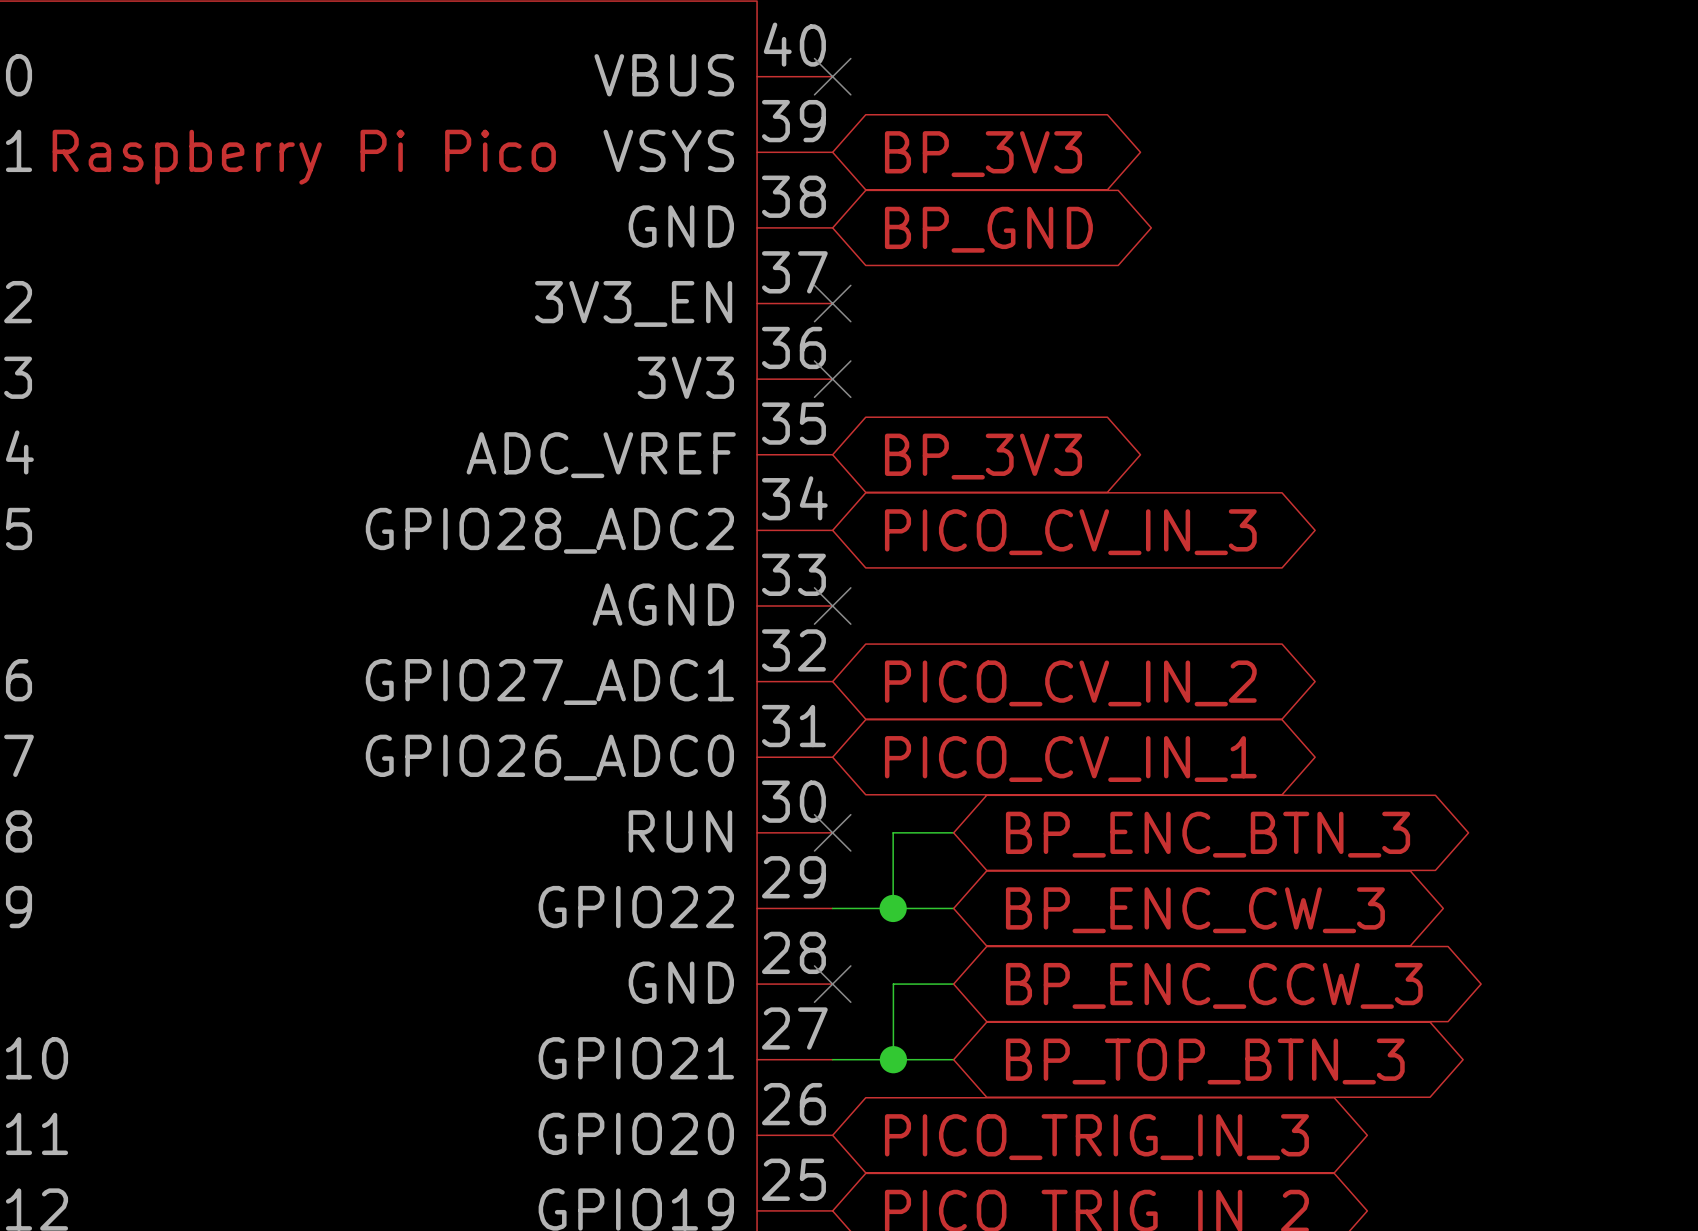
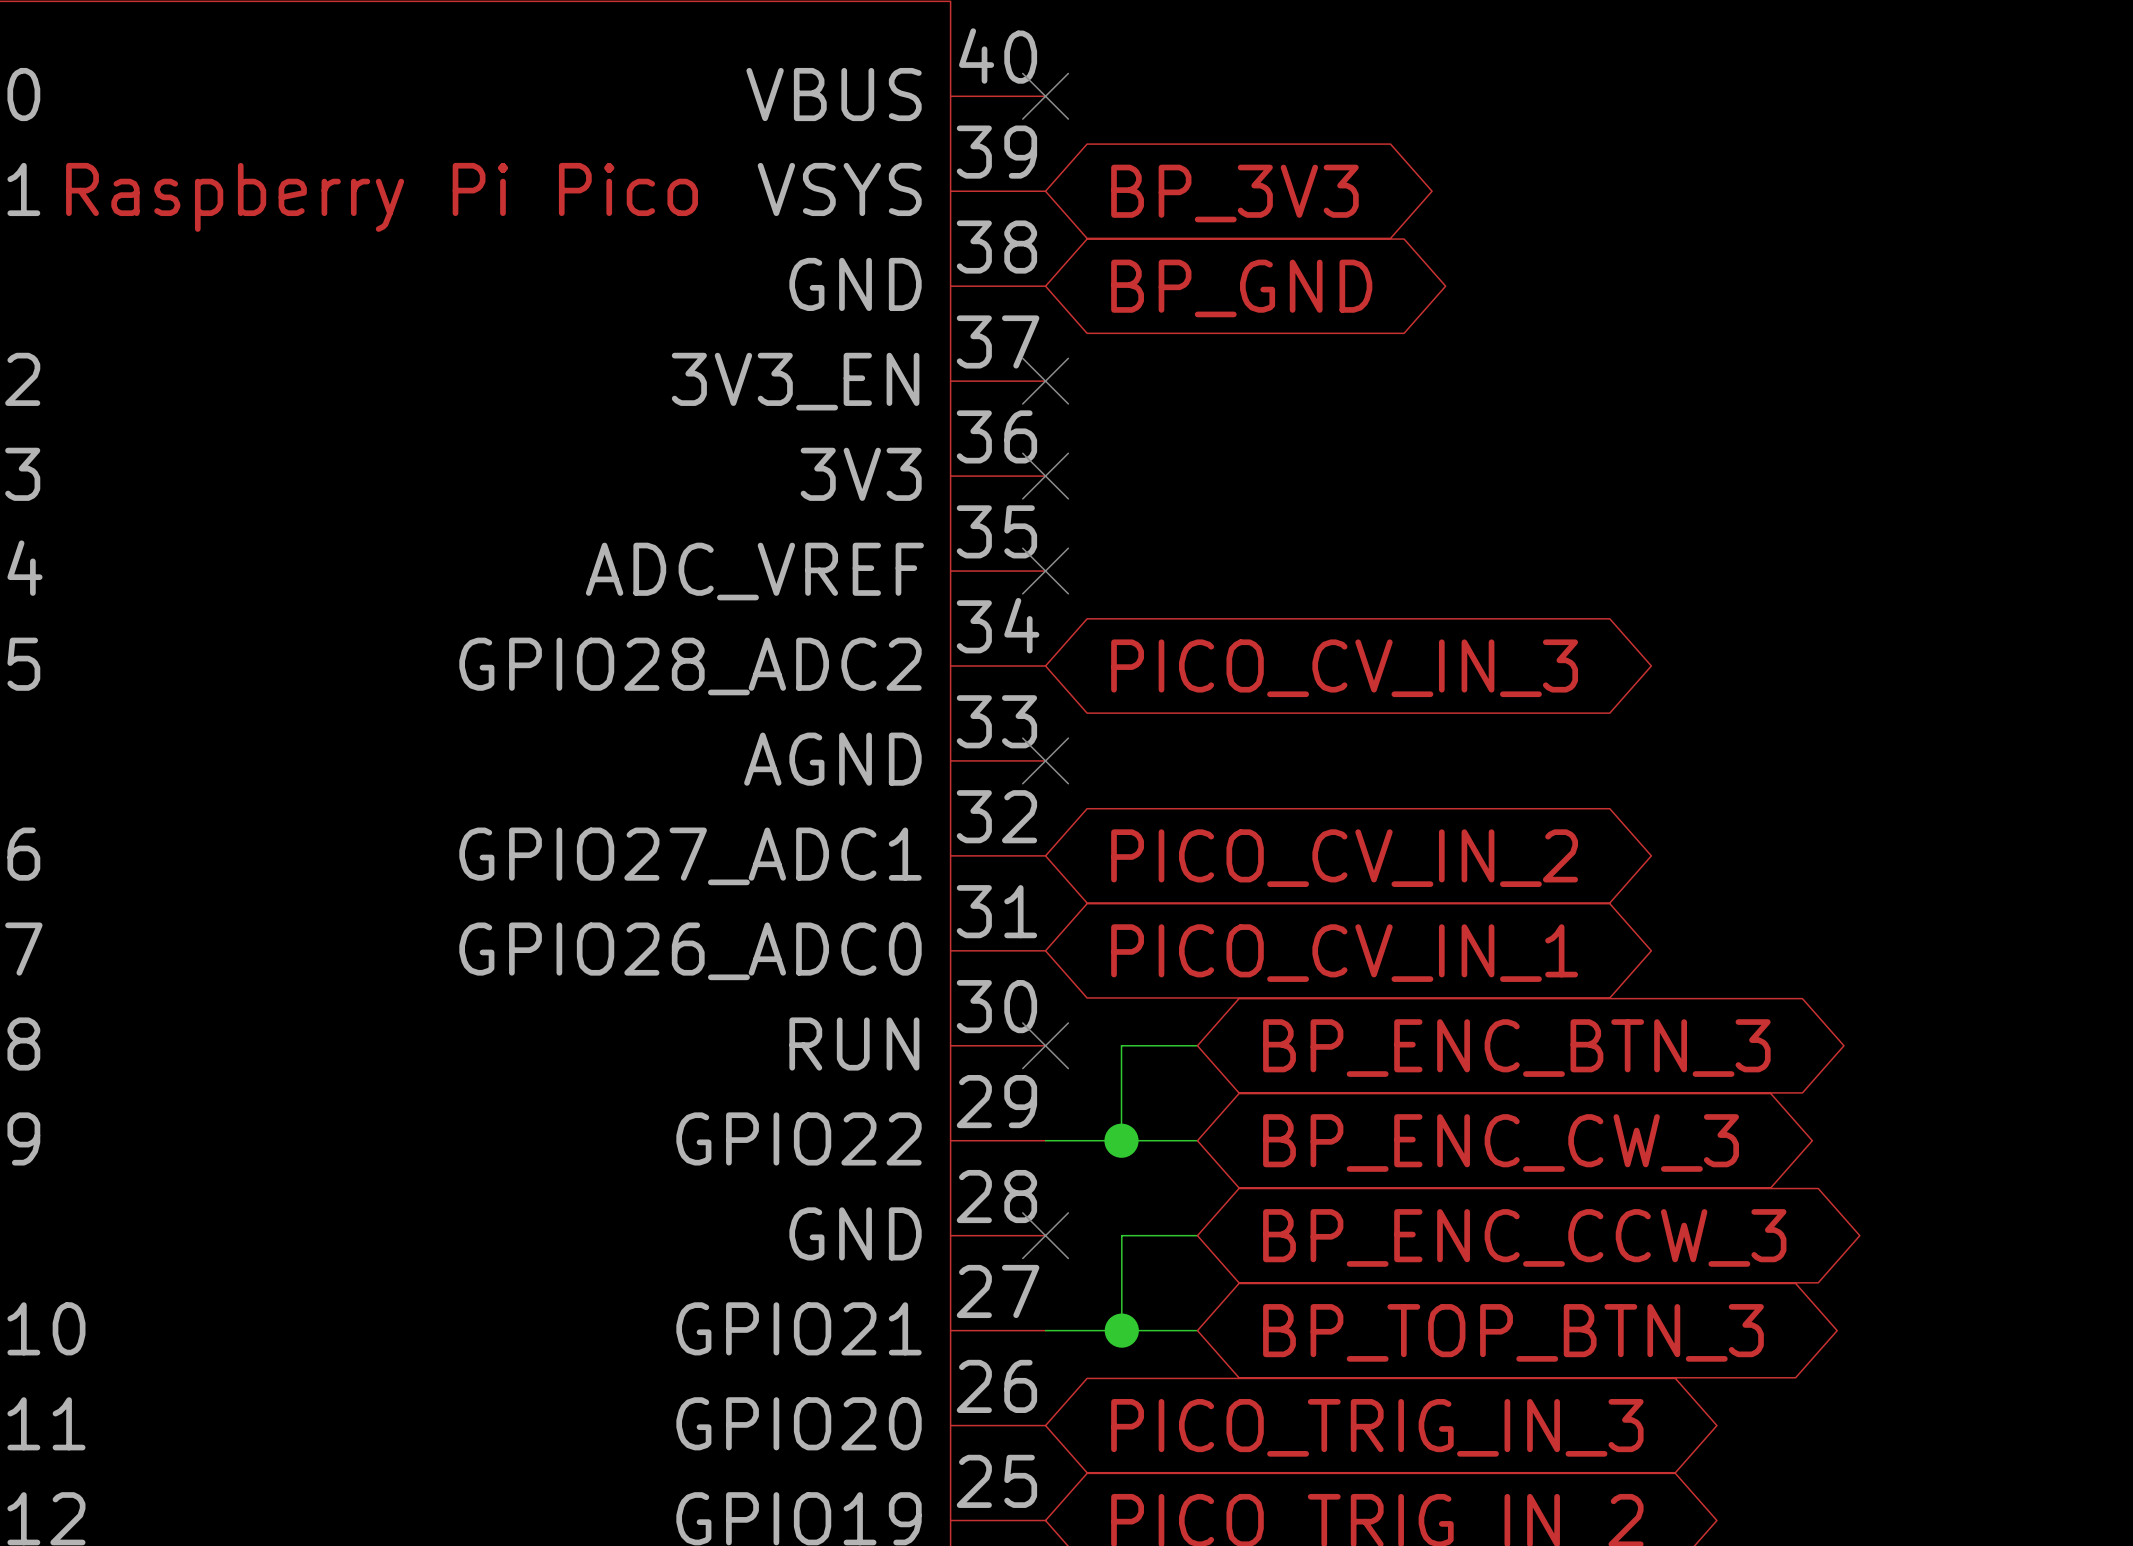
no-connect mark: none -> (1045, 571)
global label: BP_3V3 (983, 456) -> none

